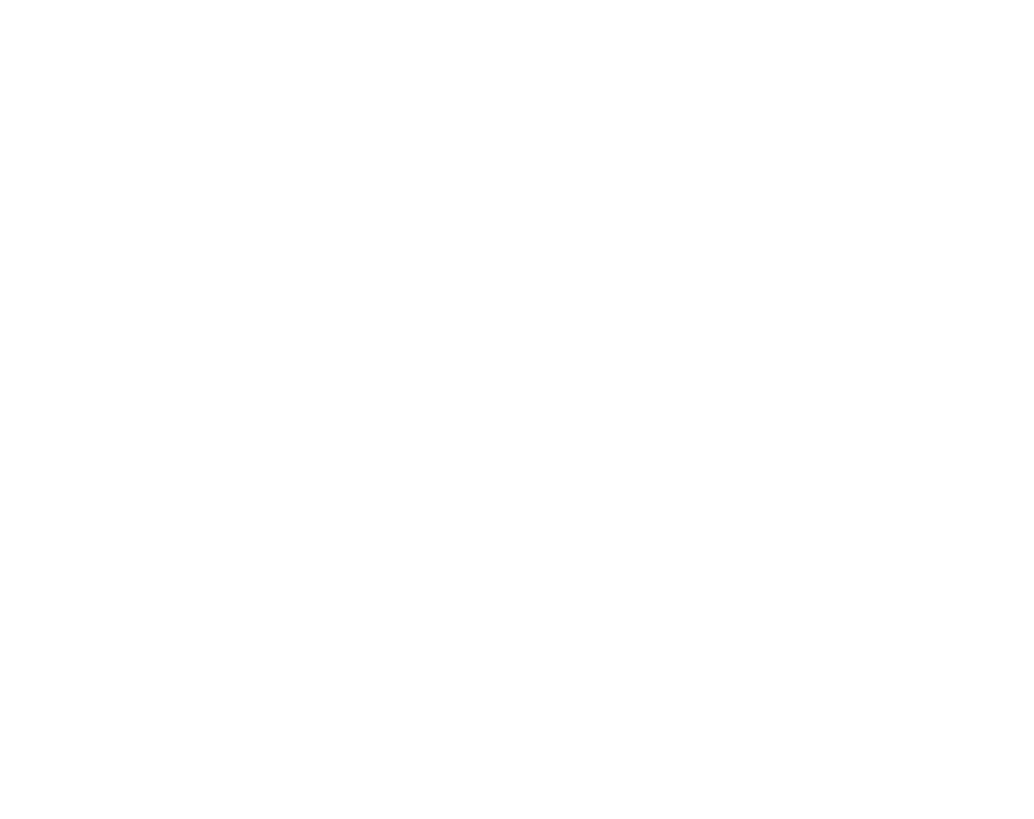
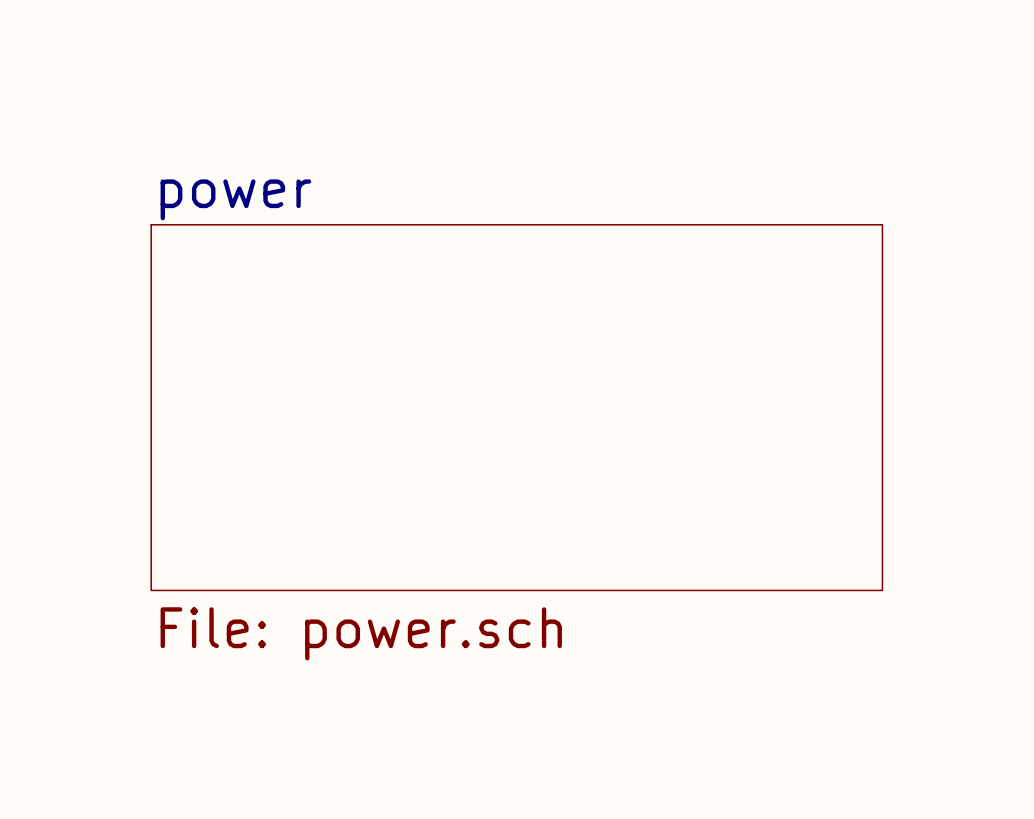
sheet power: none -> File: power.sch (516, 407)

